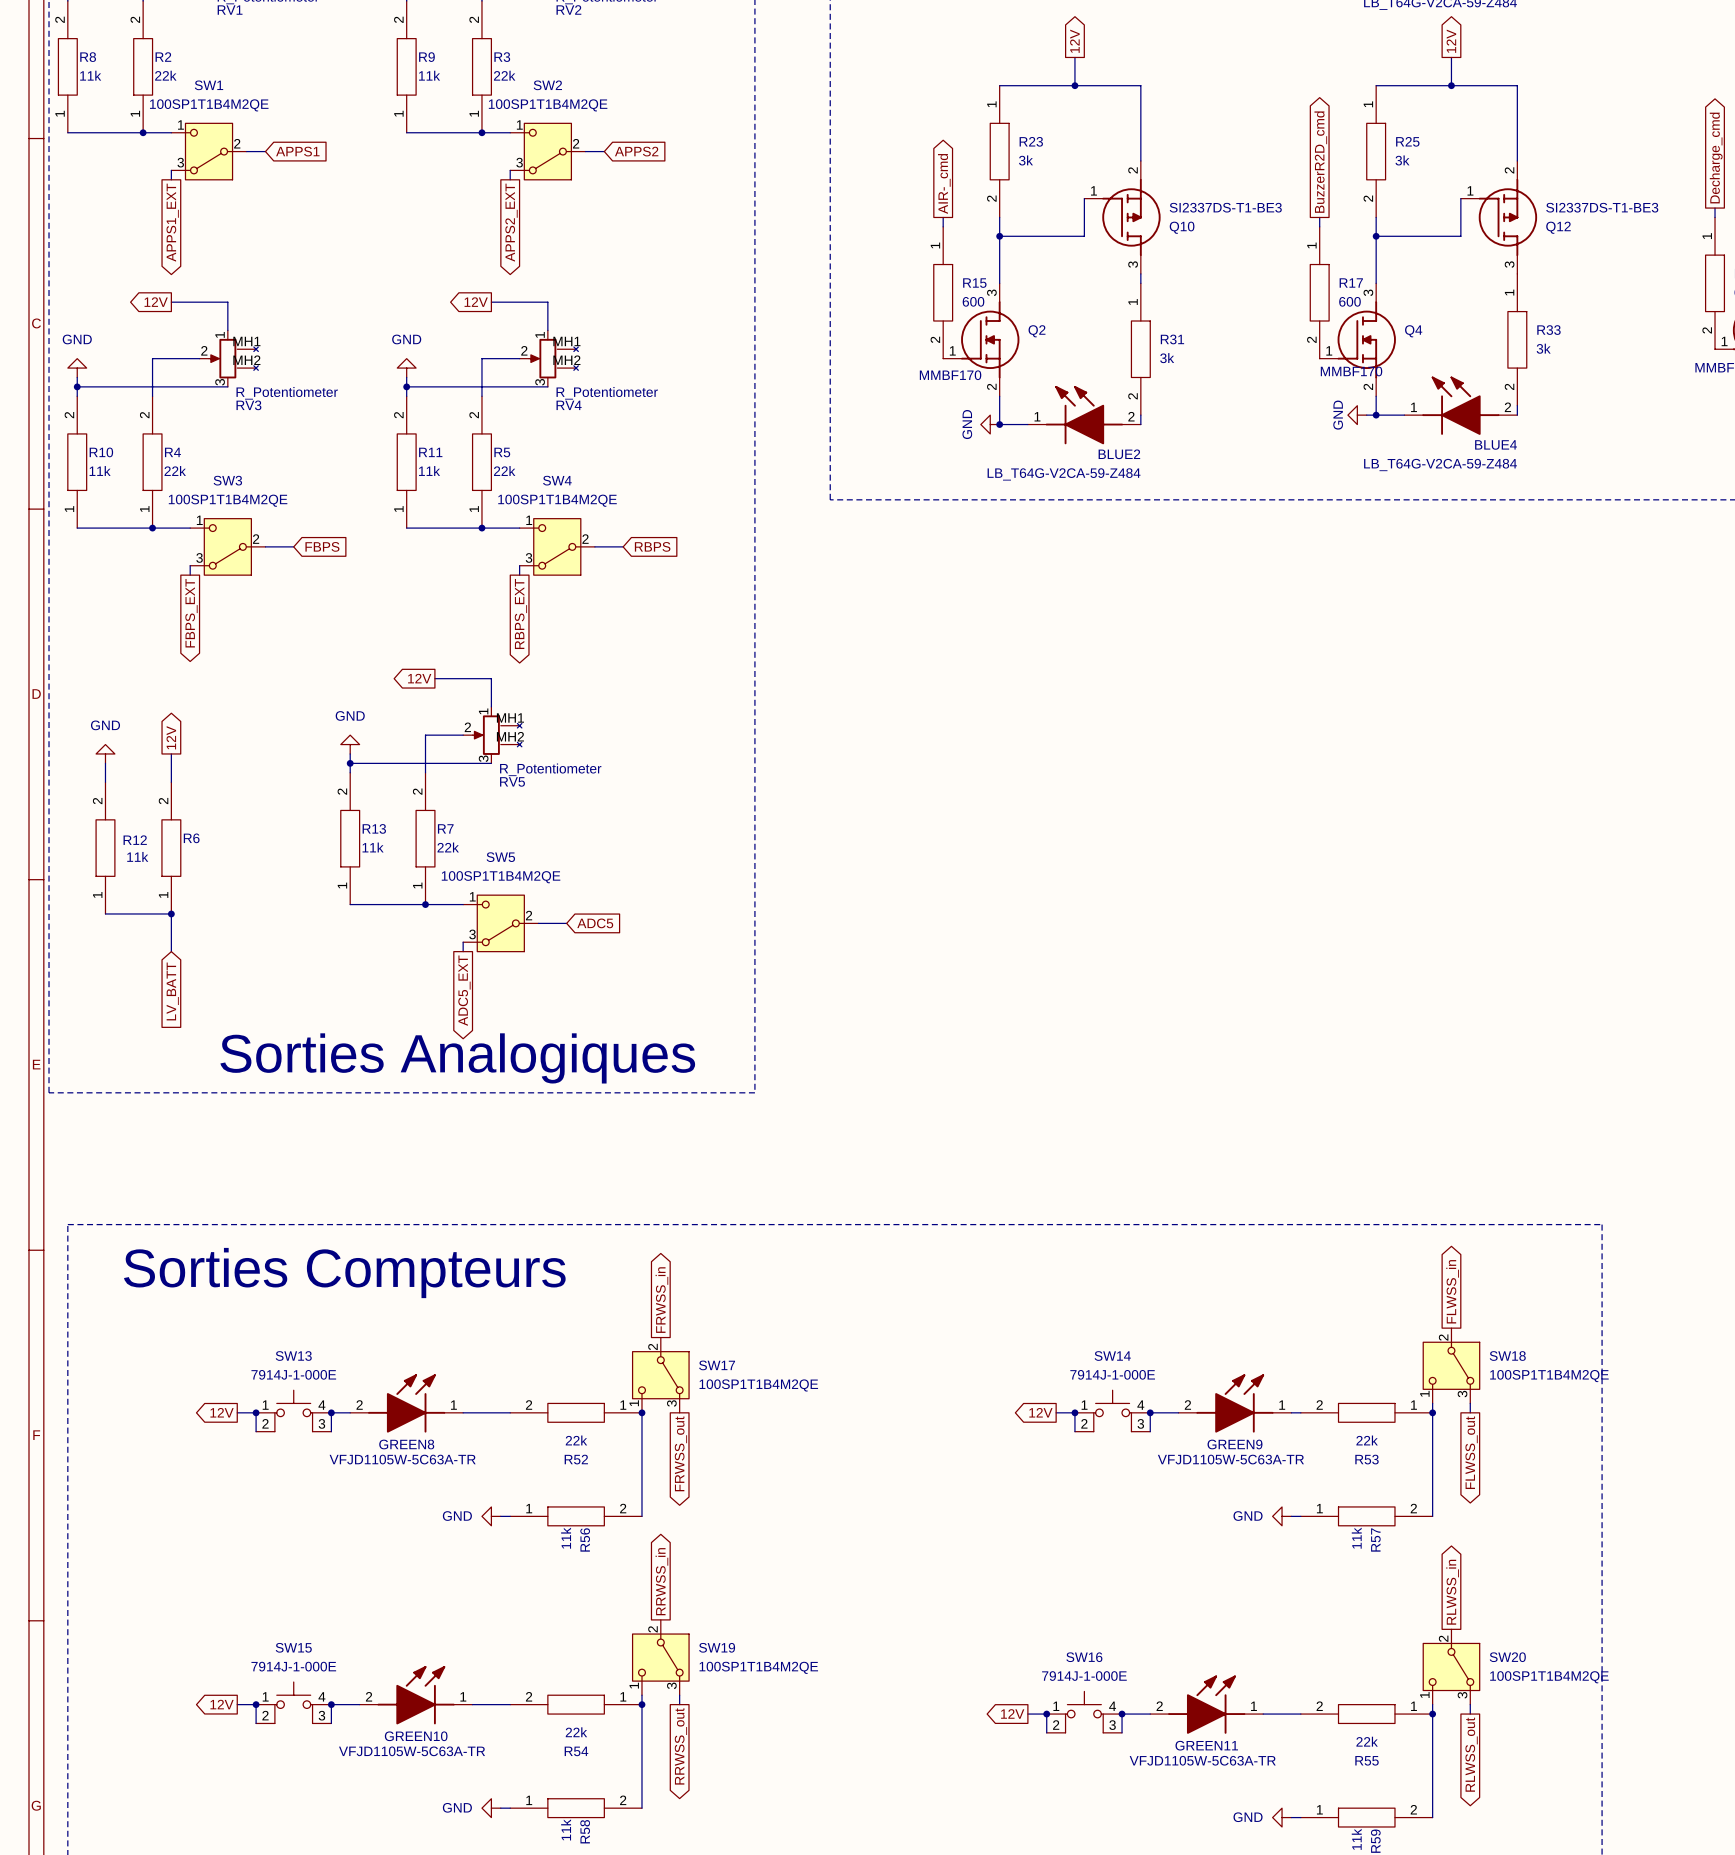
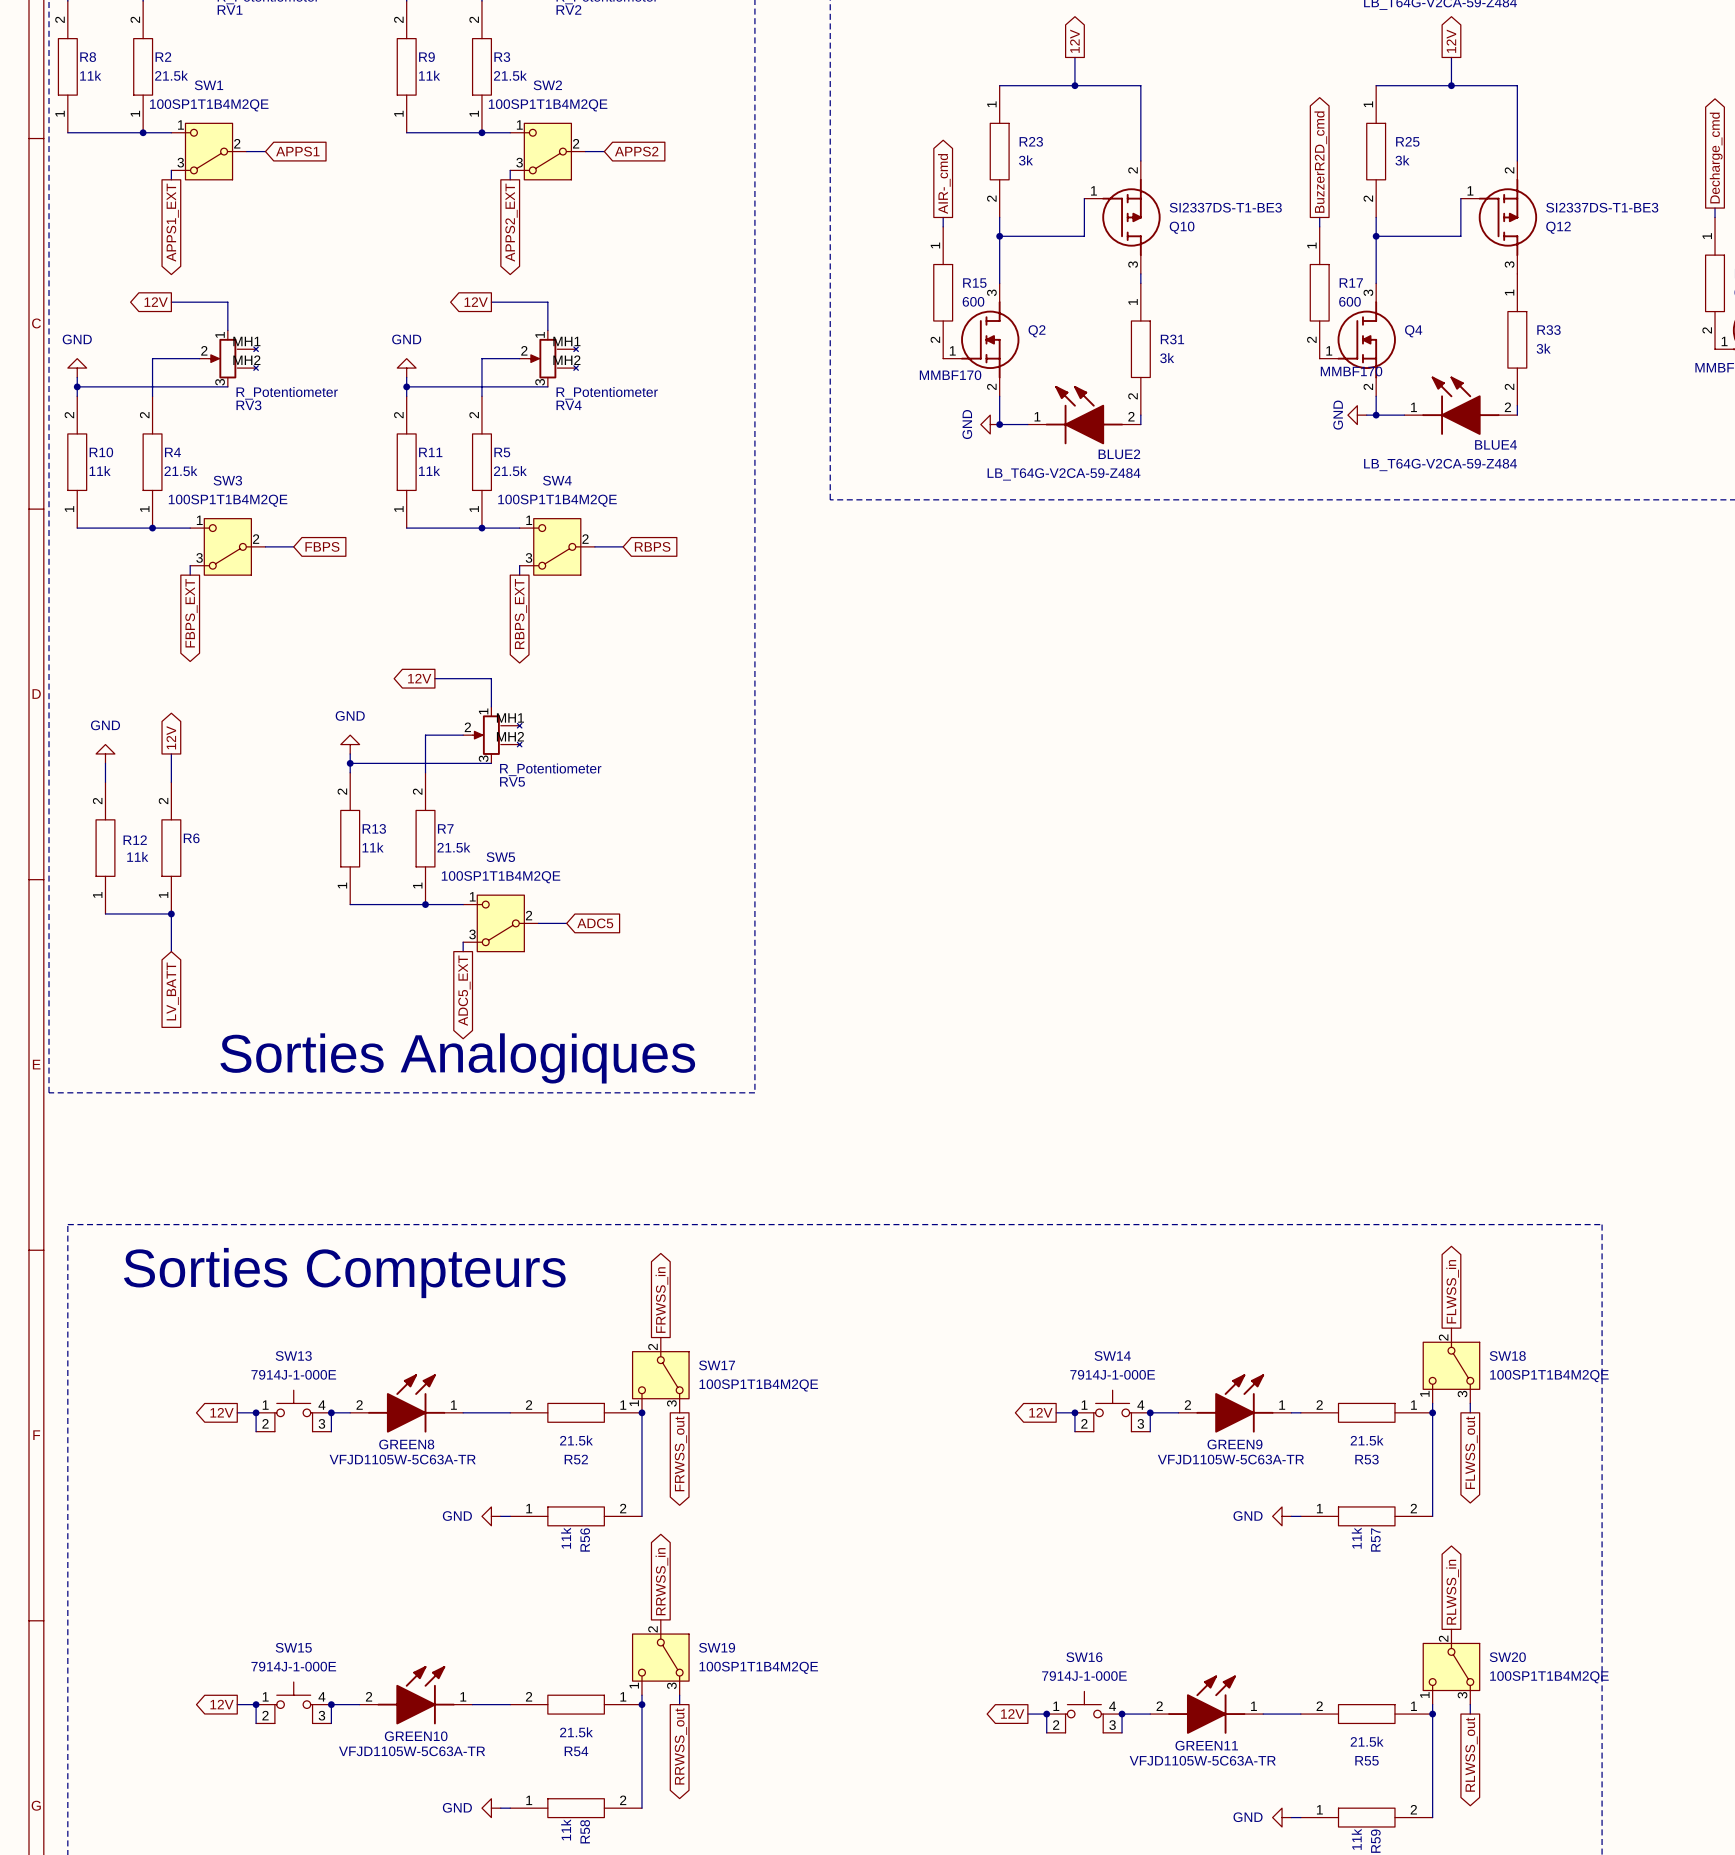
R2 value: 22k (165, 75) -> 21.5k (171, 75)
R3 value: 22k (504, 75) -> 21.5k (510, 75)
R4 value: 22k (175, 471) -> 21.5k (180, 471)
R5 value: 22k (504, 471) -> 21.5k (510, 471)
R7 value: 22k (448, 847) -> 21.5k (453, 847)
R52 value: 22k (576, 1440) -> 21.5k (576, 1440)
R53 value: 22k (1367, 1440) -> 21.5k (1367, 1440)
R54 value: 22k (576, 1732) -> 21.5k (576, 1732)
R55 value: 22k (1367, 1741) -> 21.5k (1367, 1741)

